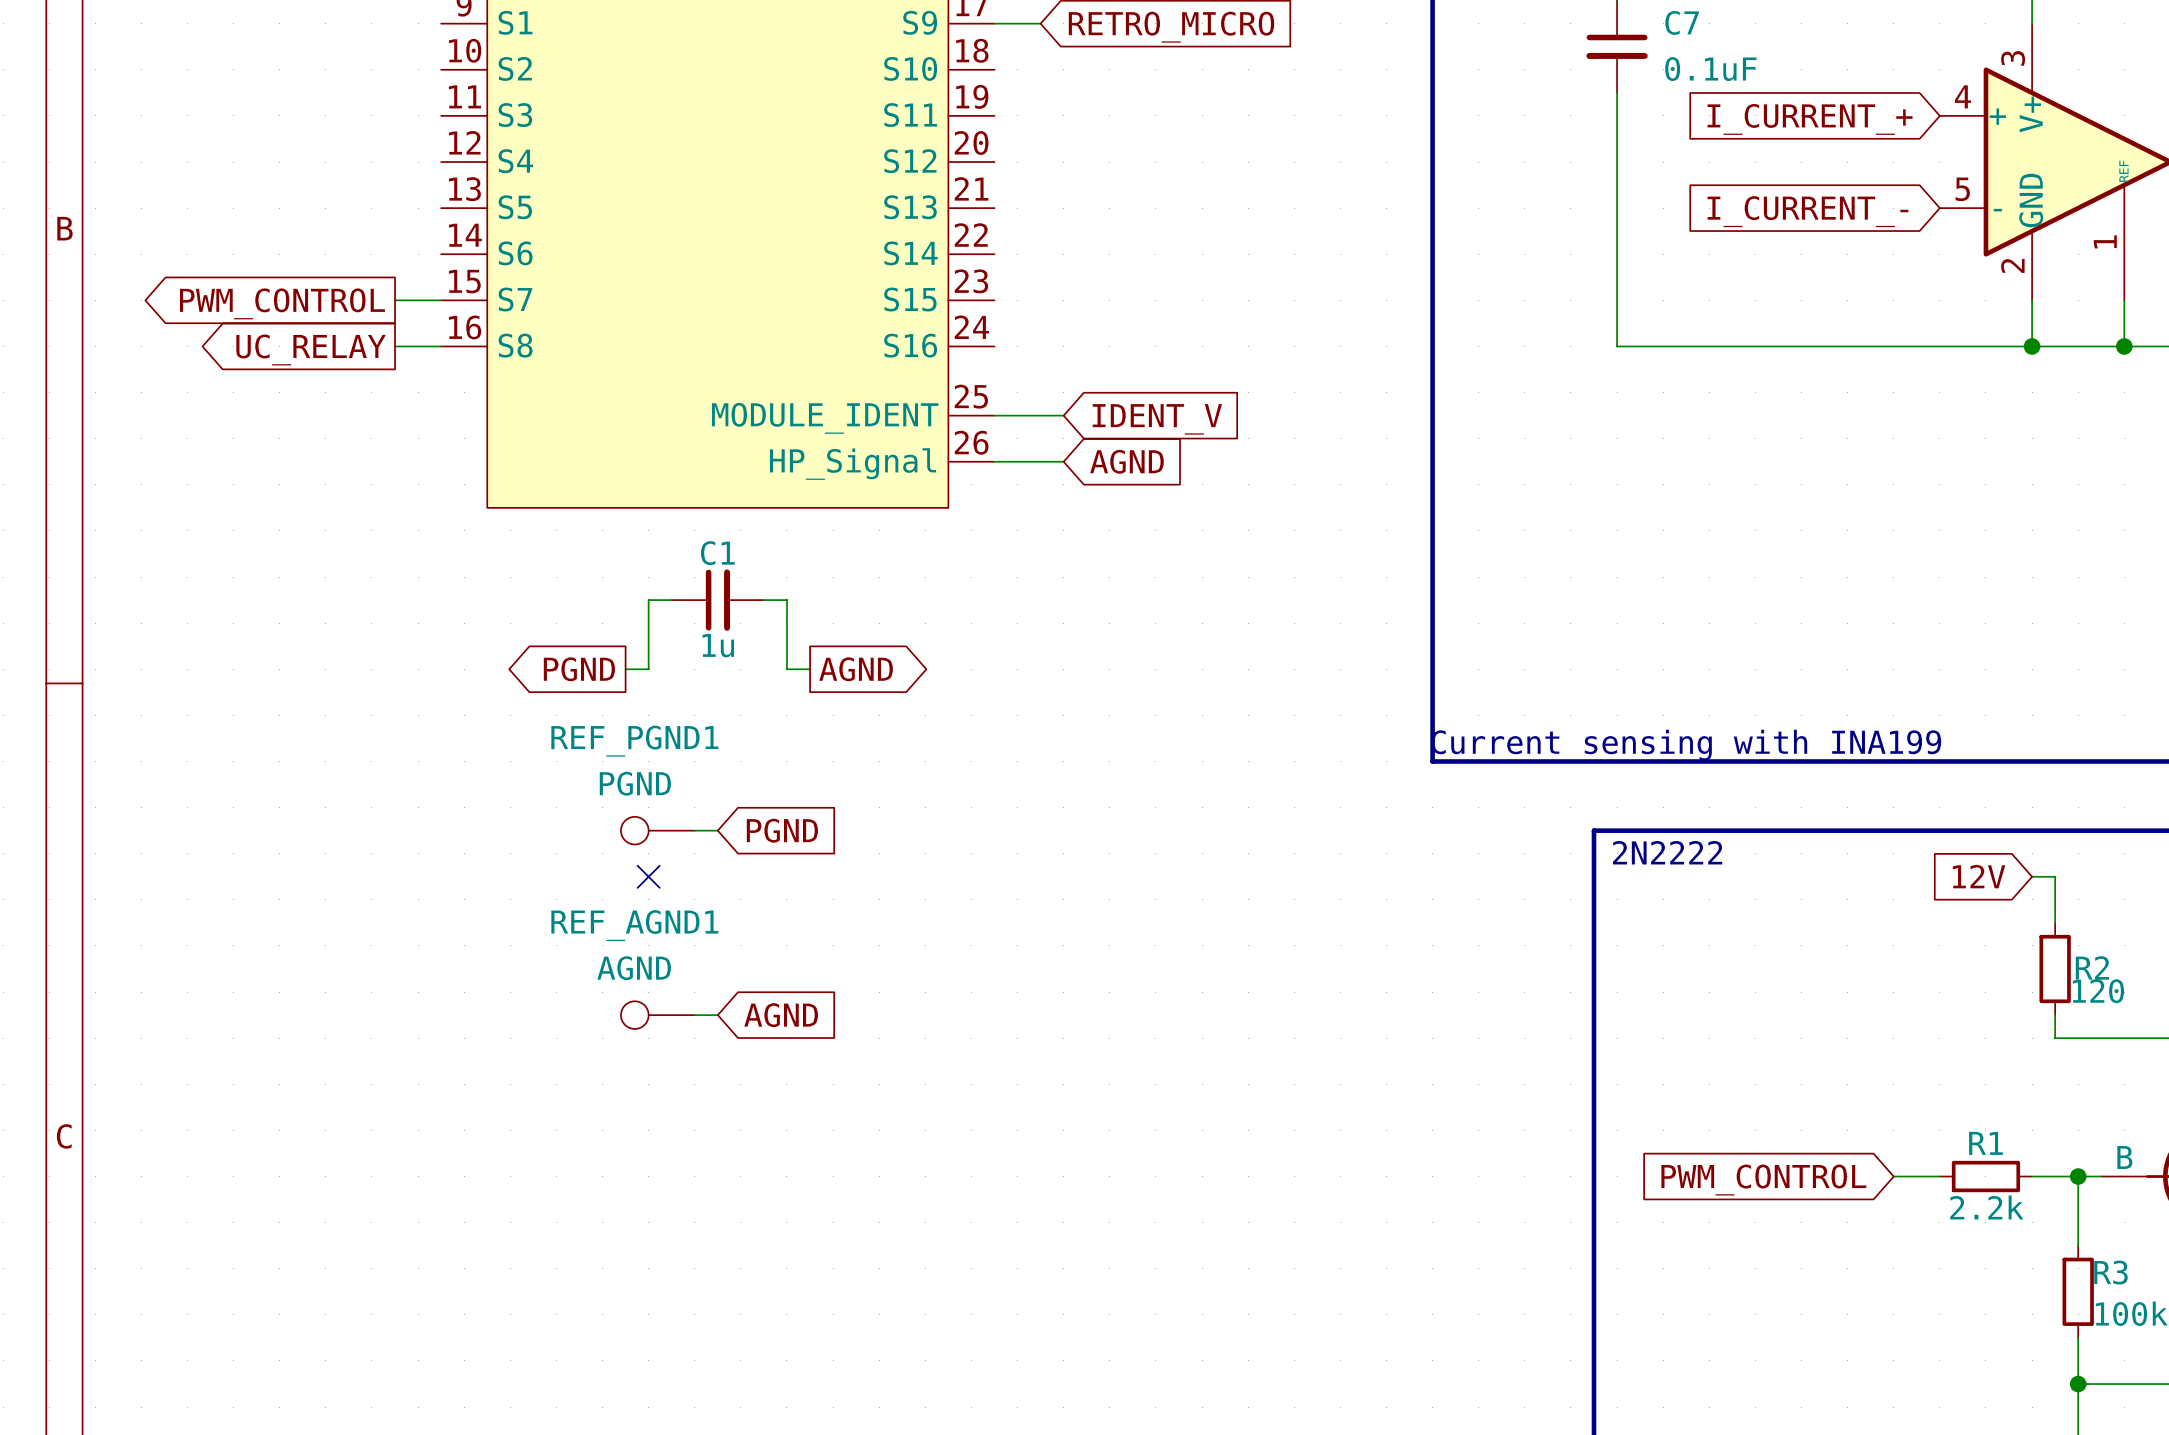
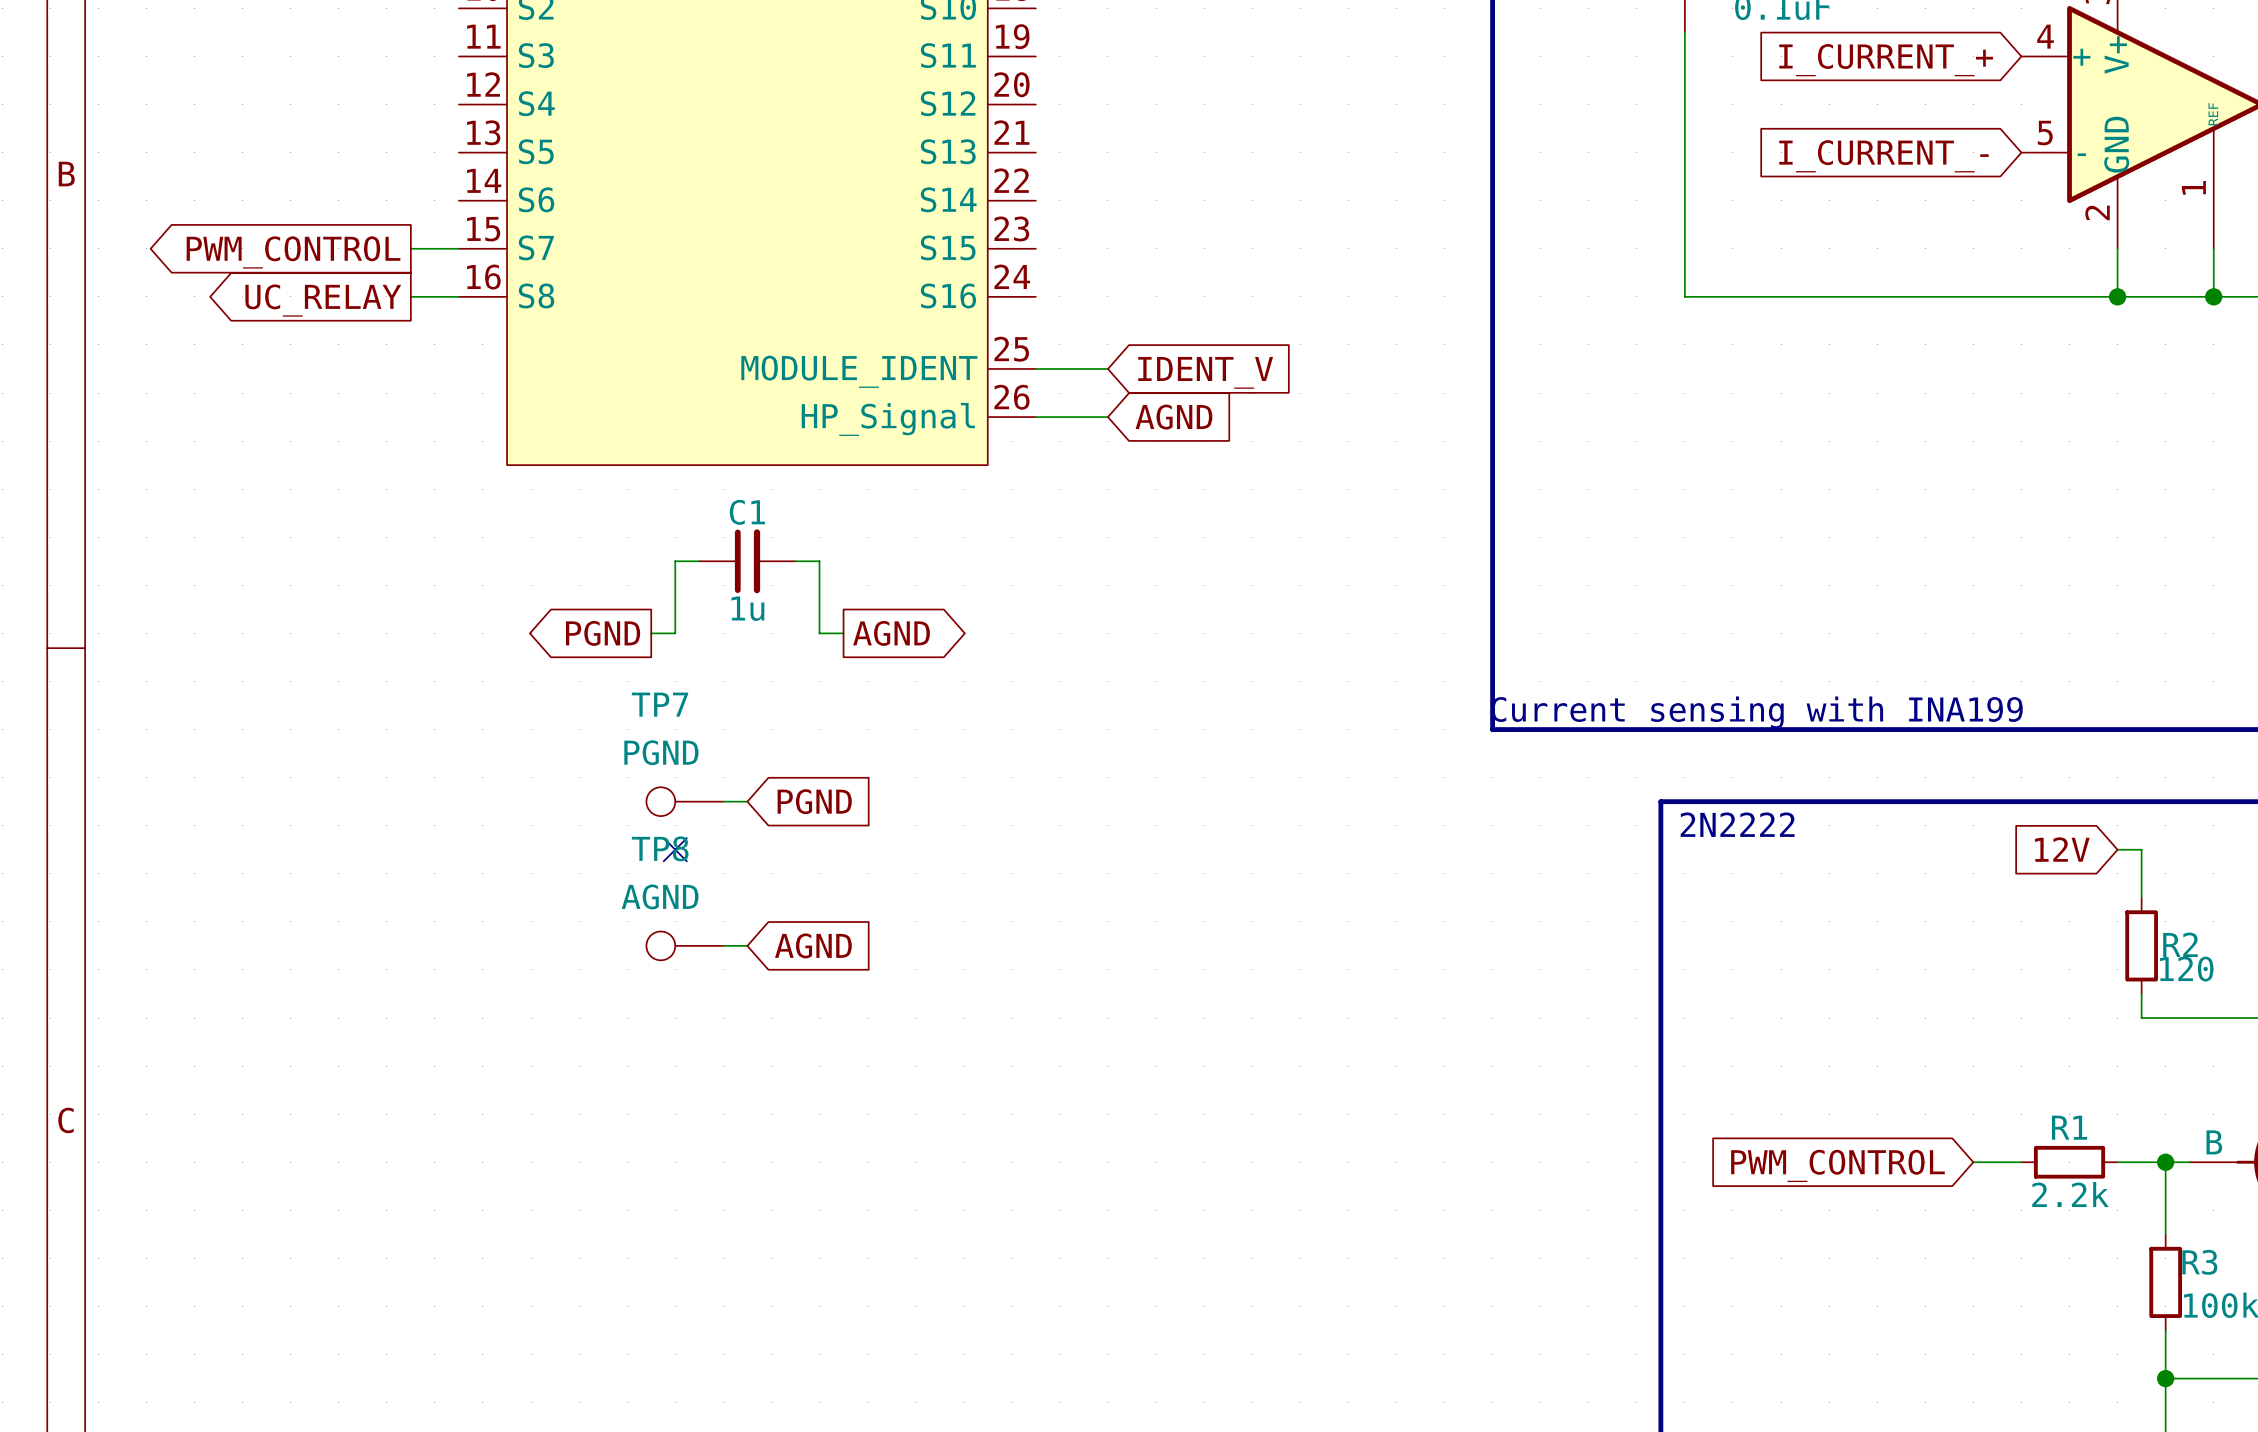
REF_PGND1 name: REF_PGND1 (634, 741) -> TP7 (659, 704)
TP8: none -> AGND (684, 945)
REF_AGND1: AGND (657, 1015) -> none
wire: (694, 1015) (717, 1015) -> (723, 945) (747, 945)
global label position: AGND (781, 1015) -> AGND (813, 945)

